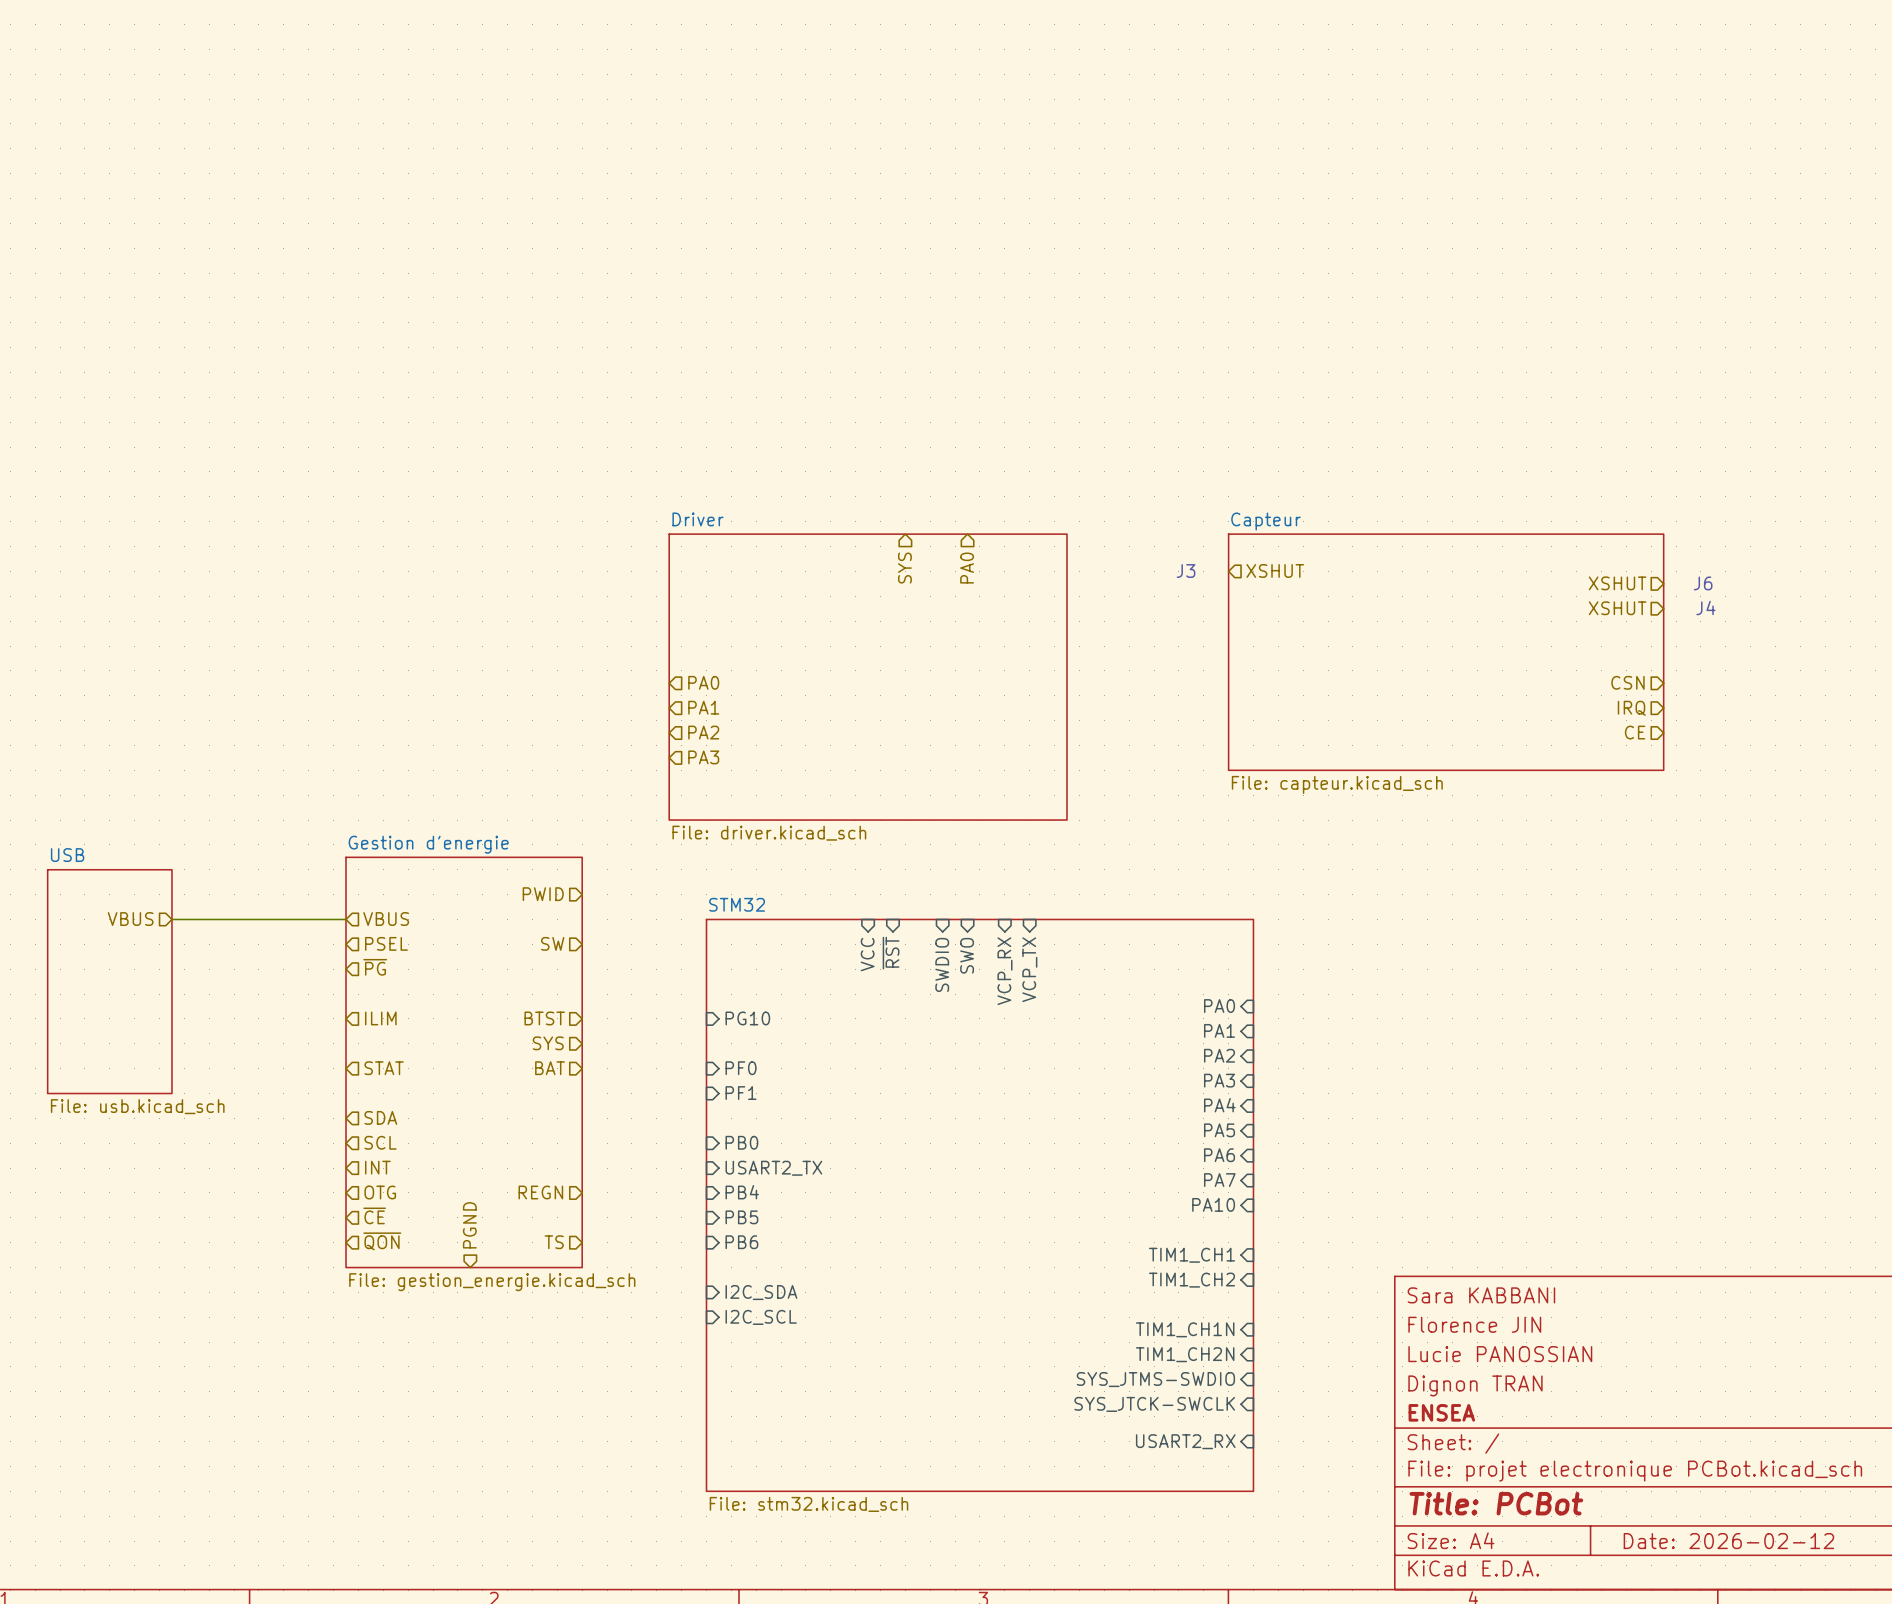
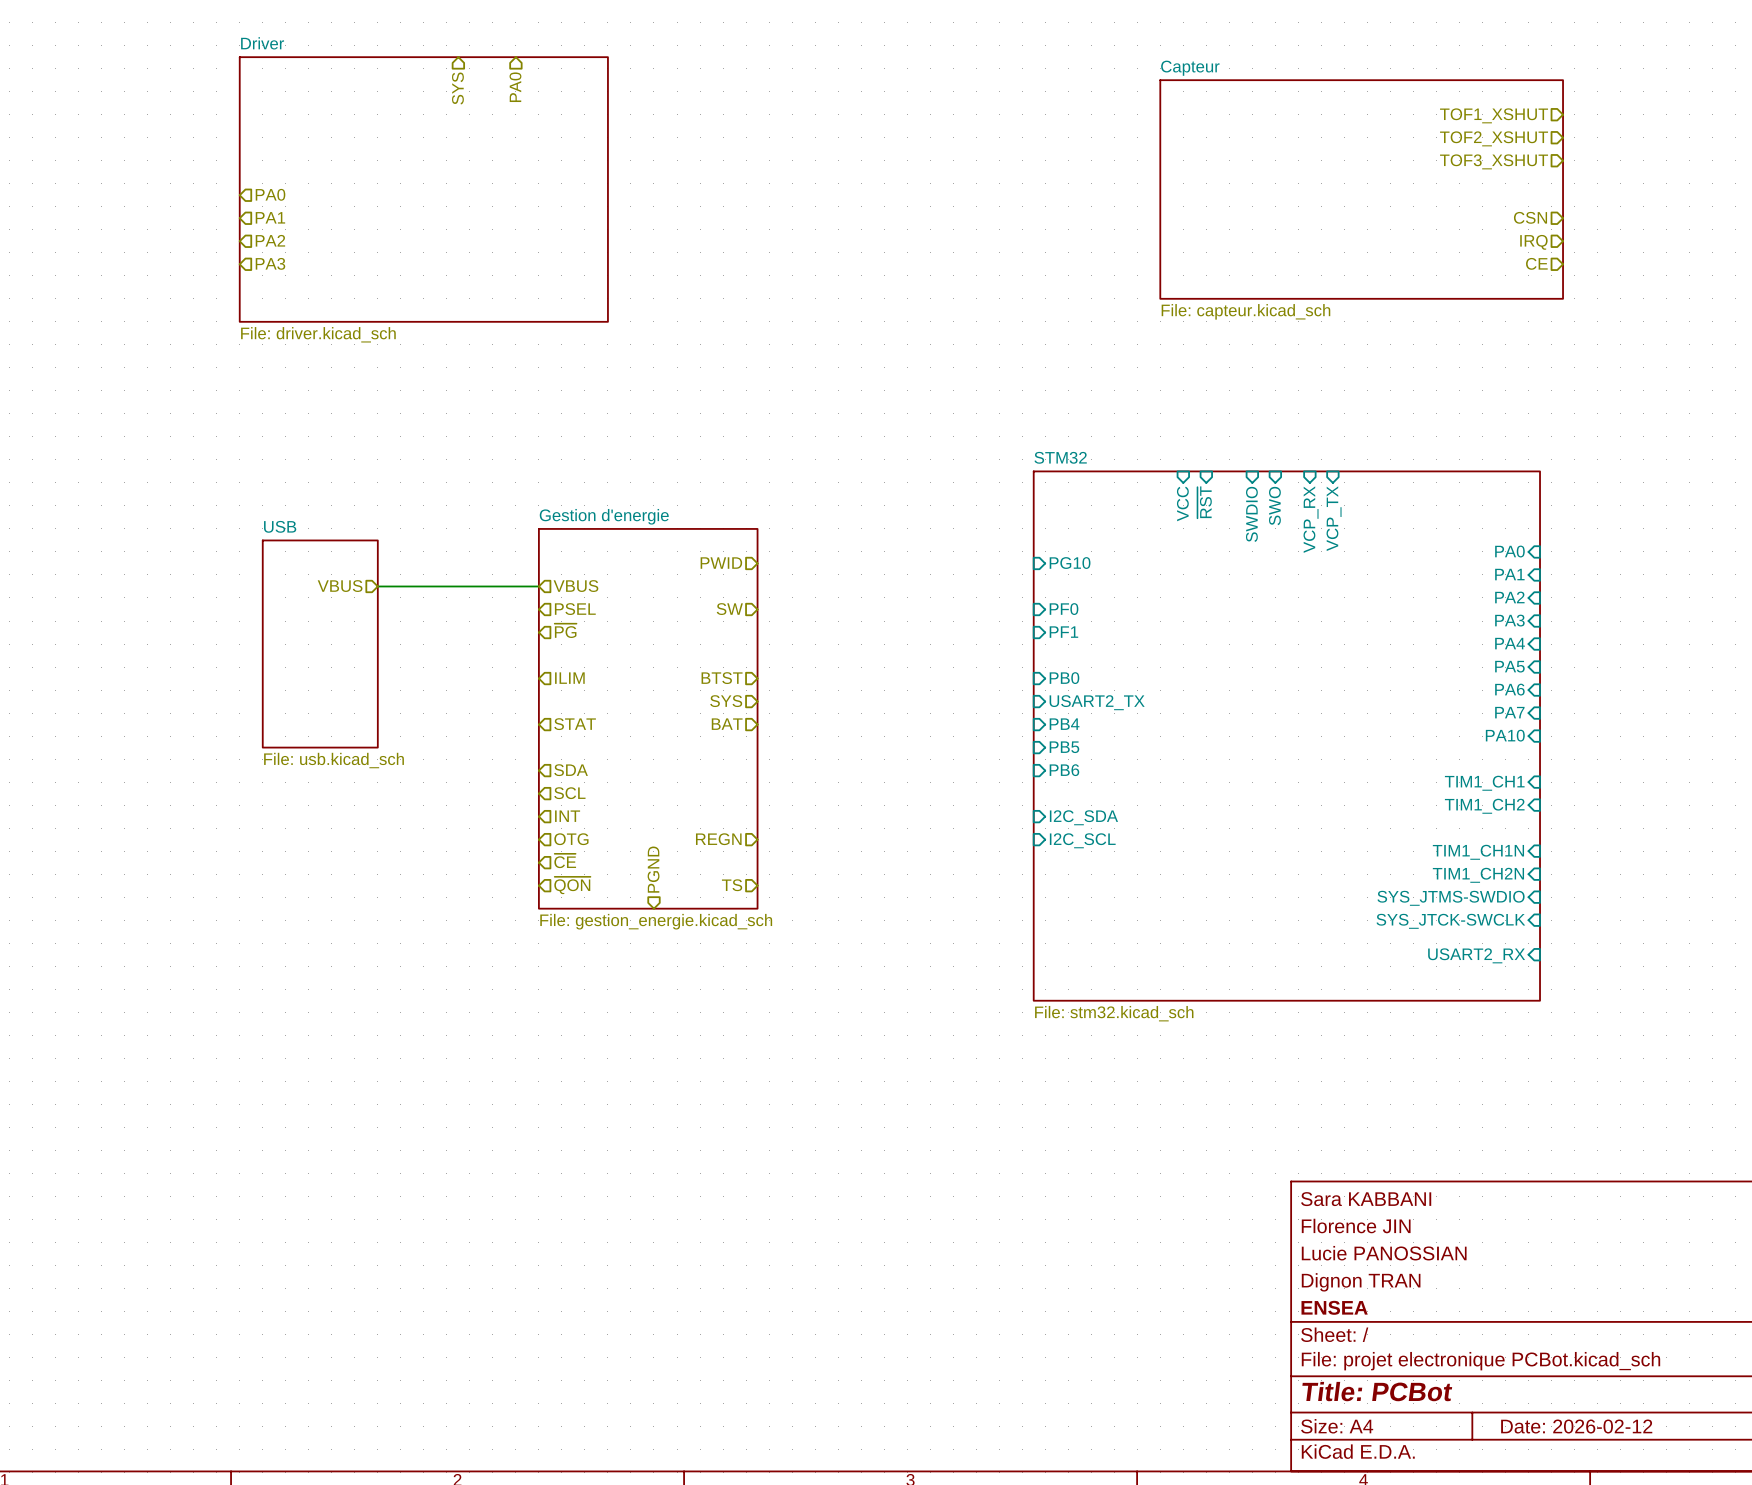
hierarchical label: none -> SYS (457, 88)
hierarchical label: none -> PA0 (515, 87)
hierarchical label: none -> TOF1_XSHUT (1494, 115)
hierarchical label: none -> TOF2_XSHUT (1494, 138)
hierarchical label: none -> TOF3_XSHUT (1494, 161)
sheet Driver: none -> File: driver.kicad_sch (423, 189)
sheet Capteur: none -> File: capteur.kicad_sch (1361, 189)
hierarchical label: none -> PA0 (270, 194)
hierarchical label: none -> PA1 (270, 217)
hierarchical label: none -> CSN (1530, 217)
hierarchical label: none -> PA2 (270, 240)
hierarchical label: none -> IRQ (1533, 242)
hierarchical label: none -> PA3 (270, 263)
hierarchical label: none -> CE (1536, 263)
sheet pin: none -> ~{RST} (1204, 502)
sheet pin: none -> VCC (1182, 503)
sheet pin: none -> SWO (1274, 506)
sheet pin: none -> SWDIO (1251, 514)
sheet pin: none -> VCP_TX (1334, 518)
sheet pin: none -> VCP_RX (1311, 519)
hierarchical label: SYS (904, 568) -> none
hierarchical label: PA0 (967, 568) -> none
text: J3 (1186, 570) -> none
hierarchical label: XSHUT (1275, 570) -> none
hierarchical label: XSHUT (1617, 583) -> none
text: J6 (1703, 583) -> none
sheet pin: none -> PA0 (1509, 551)
text: J4 (1705, 607) -> none
hierarchical label: none -> PWID (721, 563)
sheet pin: none -> PG10 (1070, 563)
hierarchical label: XSHUT (1617, 608) -> none
sheet pin: none -> PA1 (1509, 574)
hierarchical label: none -> VBUS (340, 586)
wire: none -> (377, 586) (538, 586)
hierarchical label: none -> VBUS (575, 586)
sheet pin: none -> PA2 (1509, 597)
sheet Capteur: File: capteur.kicad_sch (1446, 652) -> none
hierarchical label: none -> PSEL (575, 609)
hierarchical label: none -> SW (729, 609)
sheet pin: none -> PF0 (1064, 609)
sheet pin: none -> PA3 (1509, 620)
sheet Driver: File: driver.kicad_sch (868, 677) -> none
hierarchical label: none -> ~{PG} (565, 630)
hierarchical label: PA0 (703, 682) -> none
sheet pin: none -> PF1 (1063, 632)
hierarchical label: CSN (1627, 682) -> none
sheet pin: none -> PA4 (1510, 643)
sheet USB: none -> File: usb.kicad_sch (320, 644)
hierarchical label: PA1 (703, 707) -> none
hierarchical label: IRQ (1631, 708) -> none
sheet pin: none -> PA5 (1509, 666)
hierarchical label: none -> ILIM (569, 678)
hierarchical label: PA2 (703, 732) -> none
hierarchical label: none -> BTST (722, 678)
sheet pin: none -> PB0 (1064, 678)
hierarchical label: CE (1635, 732) -> none
sheet pin: none -> PA6 (1509, 689)
hierarchical label: PA3 (703, 757) -> none
hierarchical label: none -> SYS (726, 701)
sheet pin: none -> USART2_TX (1097, 702)
sheet pin: none -> PA7 (1509, 712)
sheet Gestion d'energie: none -> File: gestion_energie.kicad_sch (648, 718)
sheet pin: none -> PB4 (1064, 724)
hierarchical label: none -> STAT (575, 724)
hierarchical label: none -> BAT (727, 724)
sheet pin: none -> PA10 (1505, 735)
sheet pin: none -> PB5 (1064, 747)
hierarchical label: none -> SDA (571, 770)
sheet pin: none -> PB6 (1064, 770)
sheet pin: none -> TIM1_CH1 (1484, 783)
hierarchical label: none -> SCL (569, 793)
sheet pin: none -> TIM1_CH2 (1484, 806)
hierarchical label: none -> INT (567, 816)
sheet pin: none -> I2C_SDA (1083, 817)
hierarchical label: PWID (543, 894) -> none
hierarchical label: none -> OTG (571, 839)
hierarchical label: none -> REGN (718, 839)
sheet pin: none -> I2C_SCL (1082, 840)
hierarchical label: VBUS (130, 919) -> none
wire: (171, 919) (346, 919) -> none
hierarchical label: VBUS (386, 919) -> none
sheet pin: none -> TIM1_CH1N (1478, 852)
hierarchical label: none -> ~{CE} (565, 860)
hierarchical label: none -> PGND (653, 869)
hierarchical label: PSEL (386, 943) -> none
hierarchical label: SW (552, 943) -> none
sheet pin: none -> TIM1_CH2N (1478, 875)
sheet pin: ~{RST} (891, 953) -> none
sheet pin: VCC (867, 954) -> none
hierarchical label: none -> ~{QON} (572, 885)
sheet pin: SWO (967, 955) -> none
hierarchical label: none -> TS (732, 885)
sheet pin: SWDIO (942, 964) -> none
hierarchical label: ~{PG} (375, 967) -> none
sheet pin: VCP_TX (1029, 969) -> none
sheet pin: none -> SYS_JTMS-SWDIO (1451, 898)
sheet pin: VCP_RX (1004, 971) -> none
sheet USB: File: usb.kicad_sch (109, 981) -> none
sheet pin: none -> SYS_JTCK-SWCLK (1450, 921)
sheet pin: PA0 (1219, 1006) -> none
hierarchical label: ILIM (380, 1018) -> none
hierarchical label: BTST (544, 1018) -> none
sheet pin: PG10 (747, 1018) -> none
sheet pin: PA1 (1219, 1030) -> none
sheet pin: none -> USART2_RX (1476, 955)
hierarchical label: SYS (548, 1043) -> none
sheet pin: PA2 (1219, 1055) -> none
sheet Gestion d'energie: File: gestion_energie.kicad_sch (464, 1062) -> none
hierarchical label: STAT (384, 1068) -> none
hierarchical label: BAT (550, 1068) -> none
sheet pin: PF0 (741, 1068) -> none
sheet pin: PA3 (1219, 1080) -> none
sheet pin: PF1 (741, 1093) -> none
sheet pin: PA4 (1219, 1105) -> none
hierarchical label: SDA (380, 1117) -> none
sheet pin: PA5 (1219, 1130) -> none
hierarchical label: SCL (380, 1142) -> none
sheet pin: PB0 (741, 1142) -> none
sheet pin: PA6 (1219, 1155) -> none
hierarchical label: INT (377, 1167) -> none
sheet pin: USART2_TX (773, 1168) -> none
sheet pin: PA7 (1219, 1180) -> none
hierarchical label: OTG (380, 1192) -> none
hierarchical label: REGN (540, 1192) -> none
sheet pin: PB4 (742, 1192) -> none
sheet pin: PA10 (1213, 1204) -> none
sheet STM32 position: (979, 1205) -> (1286, 736)
hierarchical label: ~{CE} (374, 1215) -> none
sheet pin: PB5 (741, 1217) -> none
hierarchical label: PGND (469, 1225) -> none
hierarchical label: ~{QON} (382, 1241) -> none
hierarchical label: TS (554, 1242) -> none
sheet pin: PB6 (741, 1242) -> none
sheet pin: TIM1_CH1 (1191, 1255) -> none
sheet pin: TIM1_CH2 (1191, 1280) -> none
sheet pin: I2C_SDA (761, 1292) -> none
sheet pin: I2C_SCL (761, 1317) -> none
sheet pin: TIM1_CH1N (1185, 1329) -> none
sheet pin: TIM1_CH2N (1185, 1354) -> none
sheet pin: SYS_JTMS-SWDIO (1155, 1379) -> none
sheet pin: SYS_JTCK-SWCLK (1154, 1404) -> none
sheet pin: USART2_RX (1185, 1441) -> none

